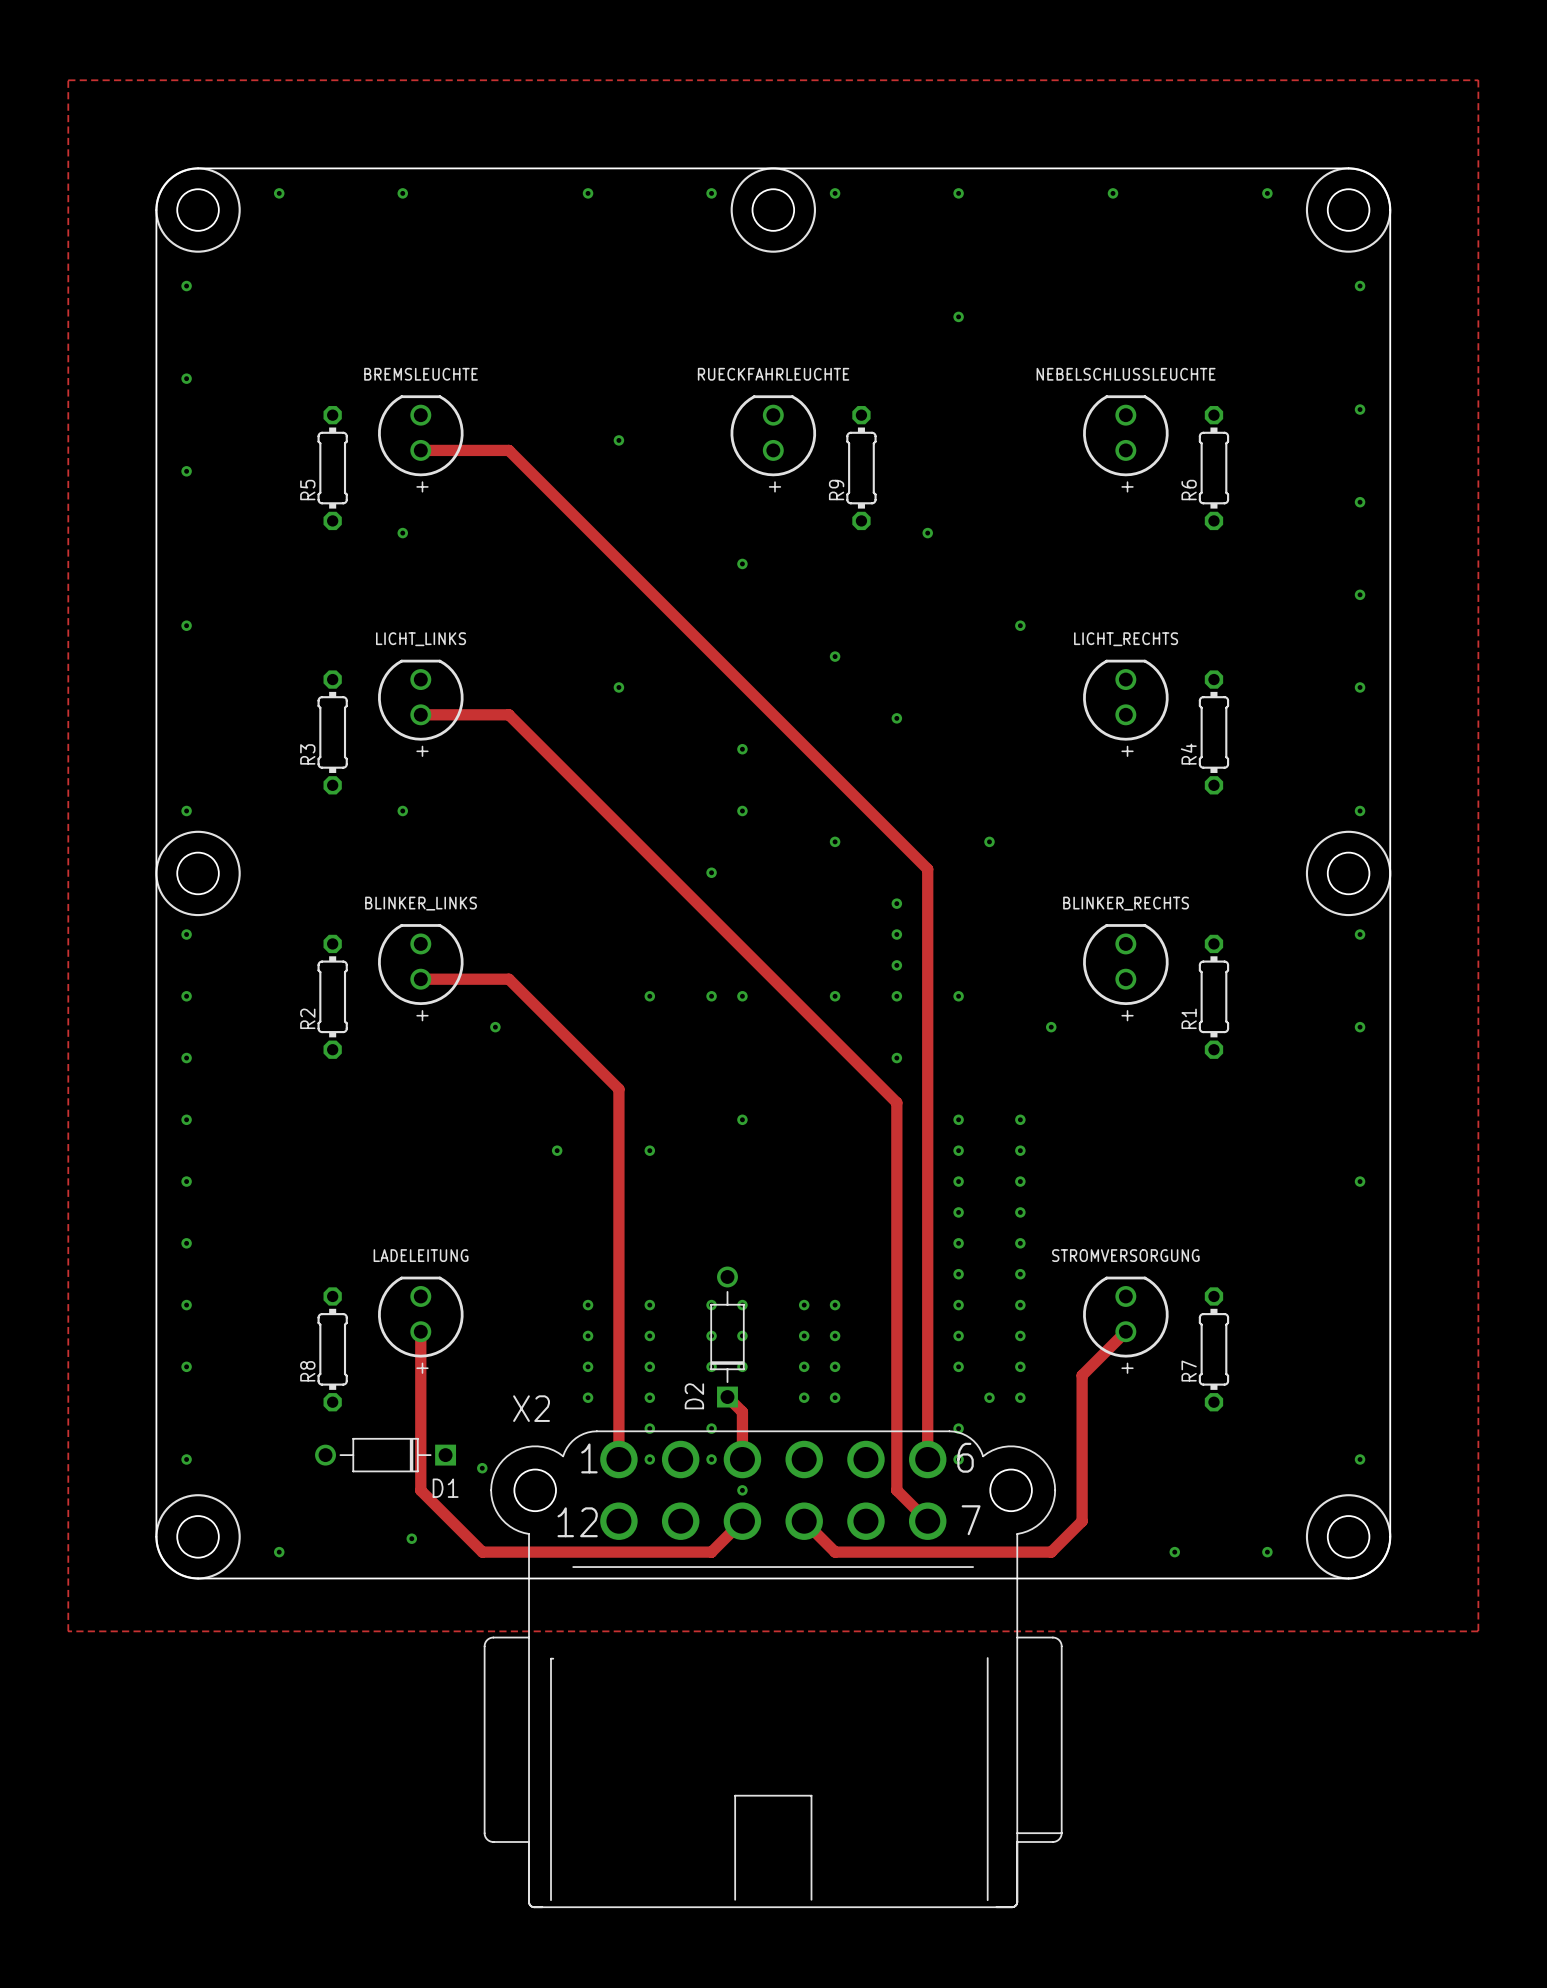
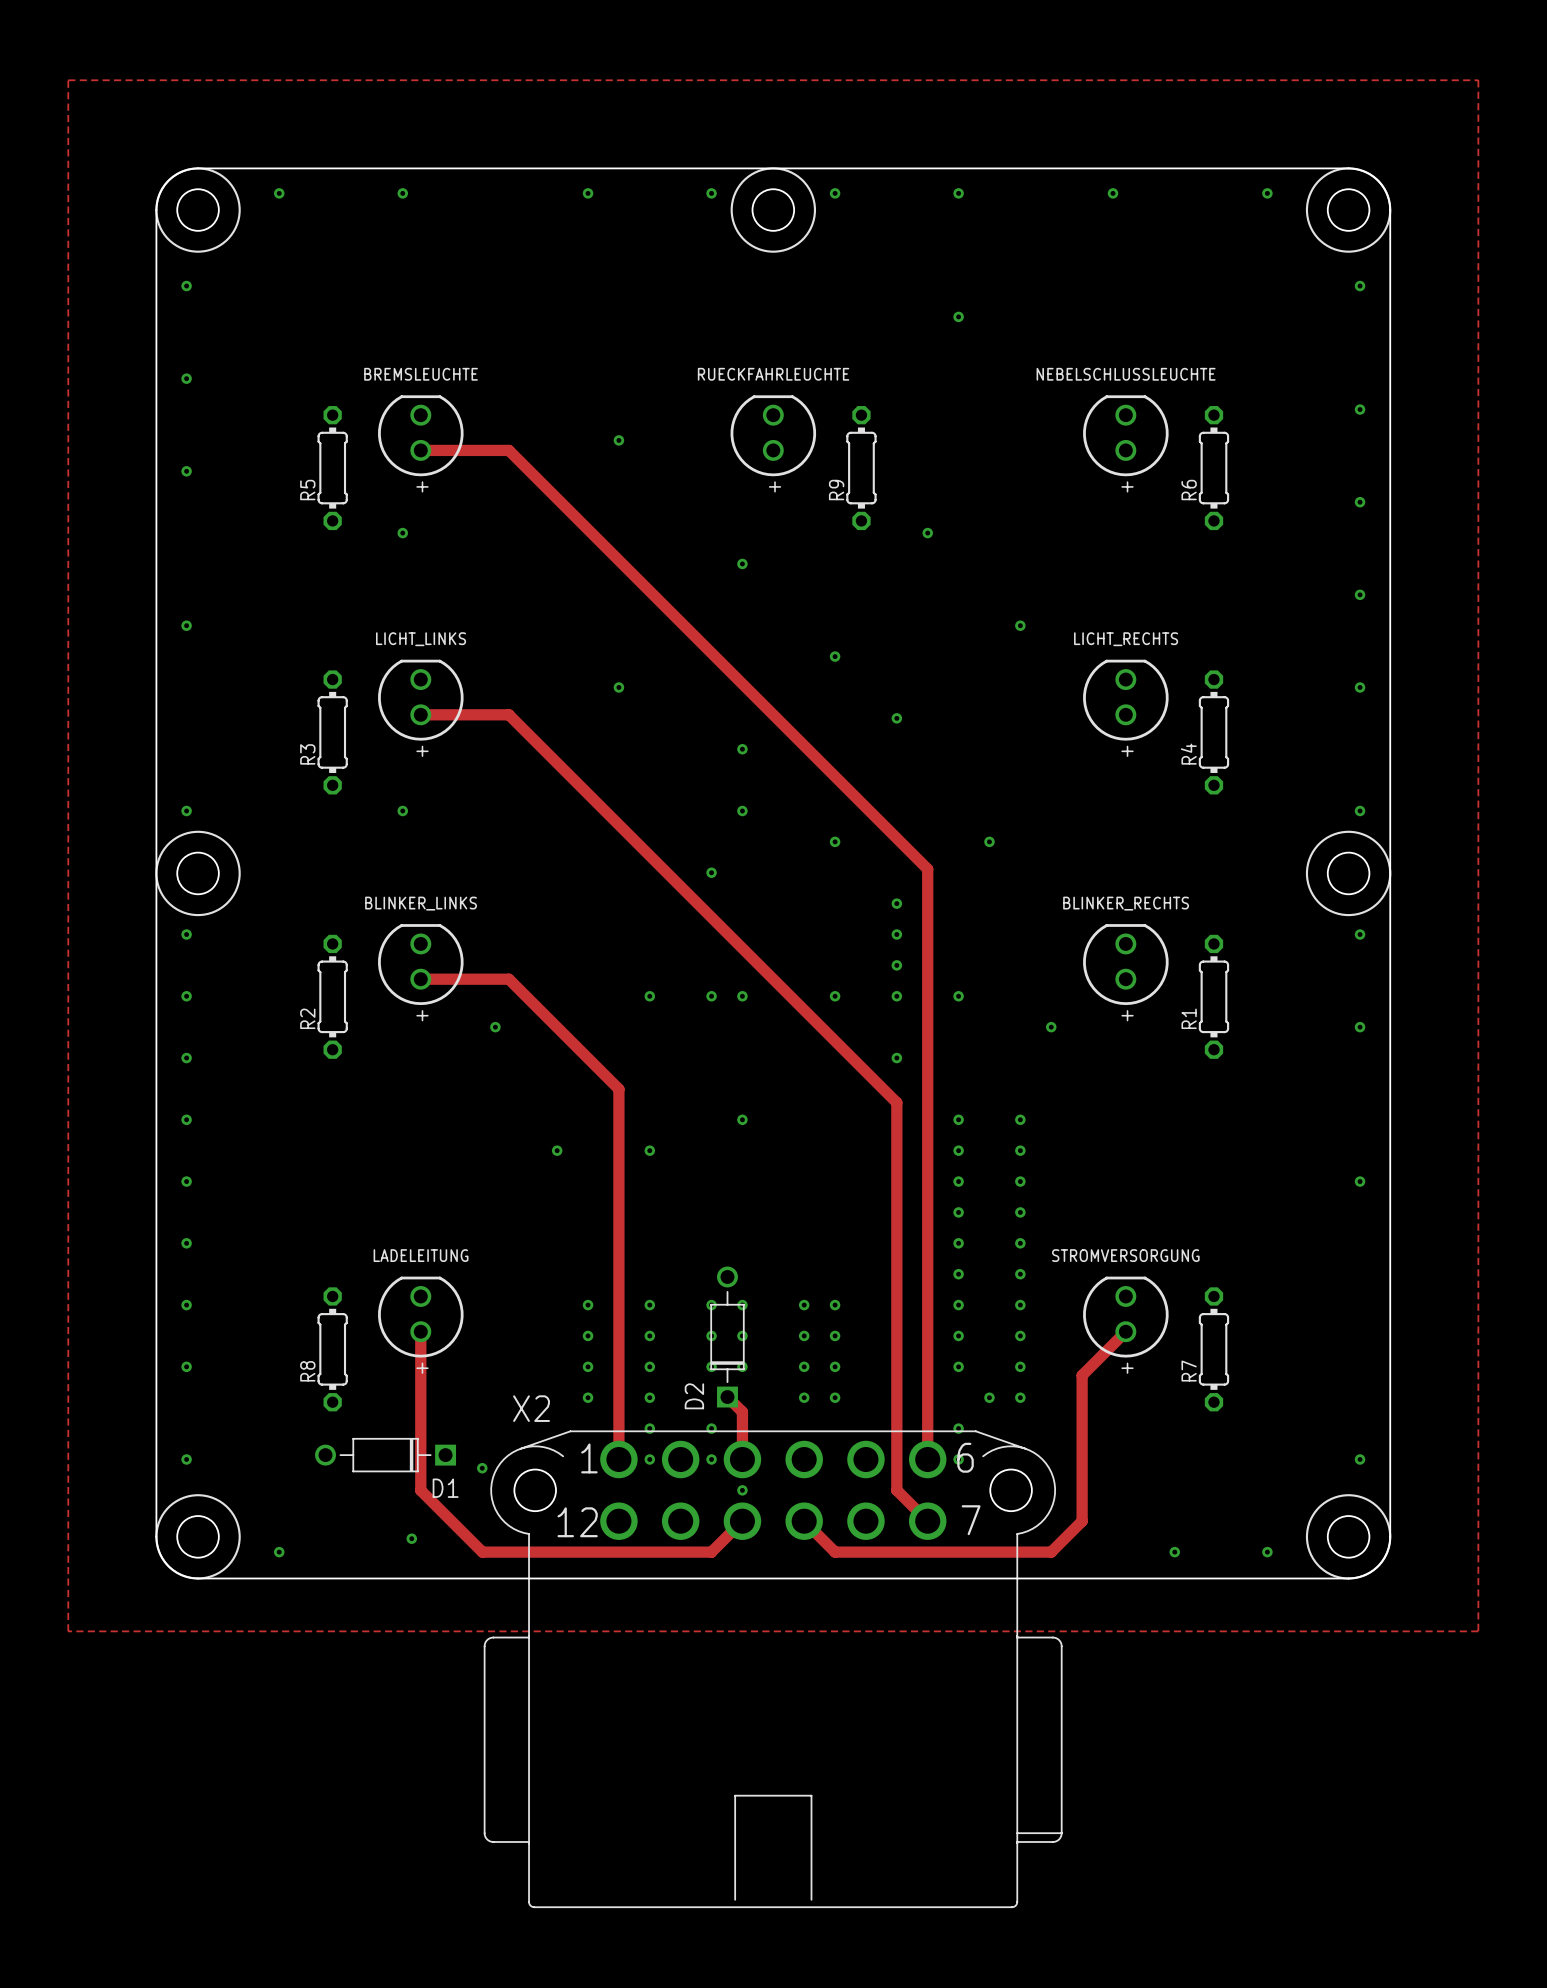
X2 footprint: [483, 1430, 1063, 1908] -> [483, 1430, 1063, 1908]

